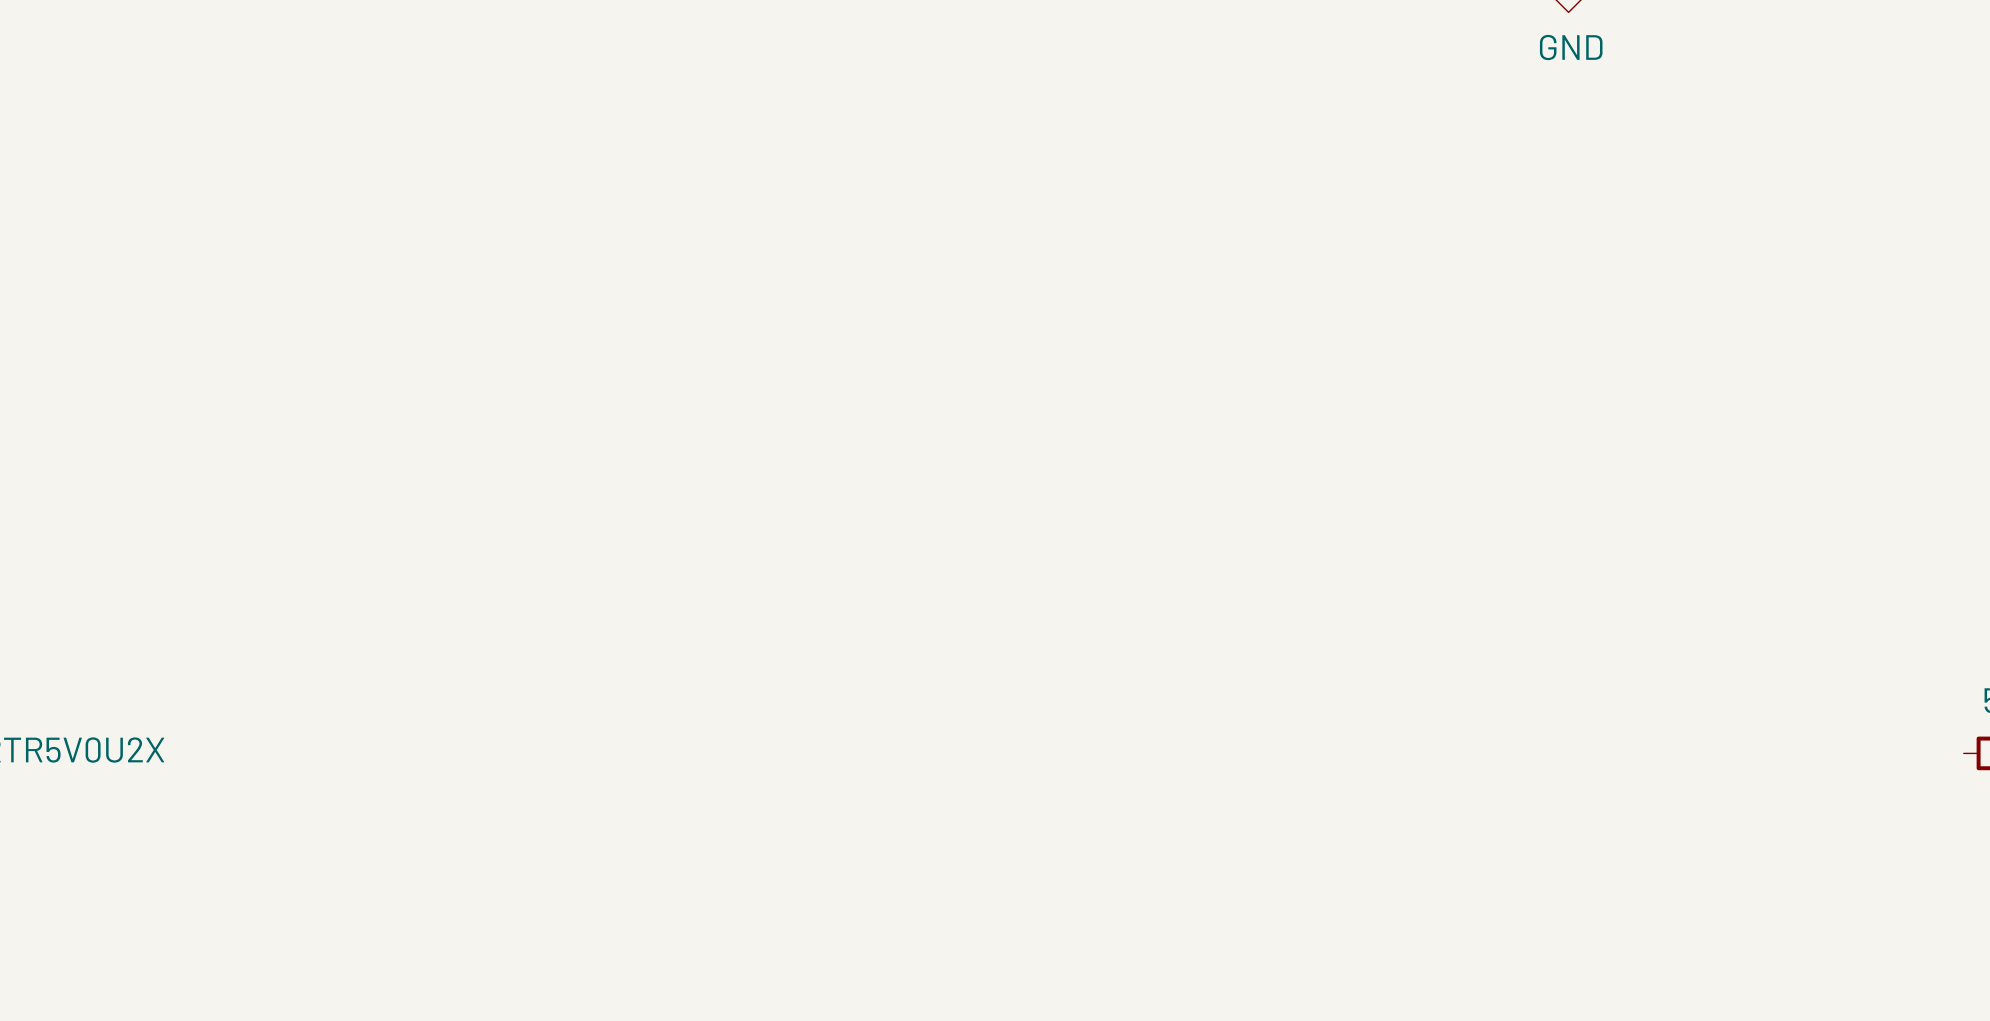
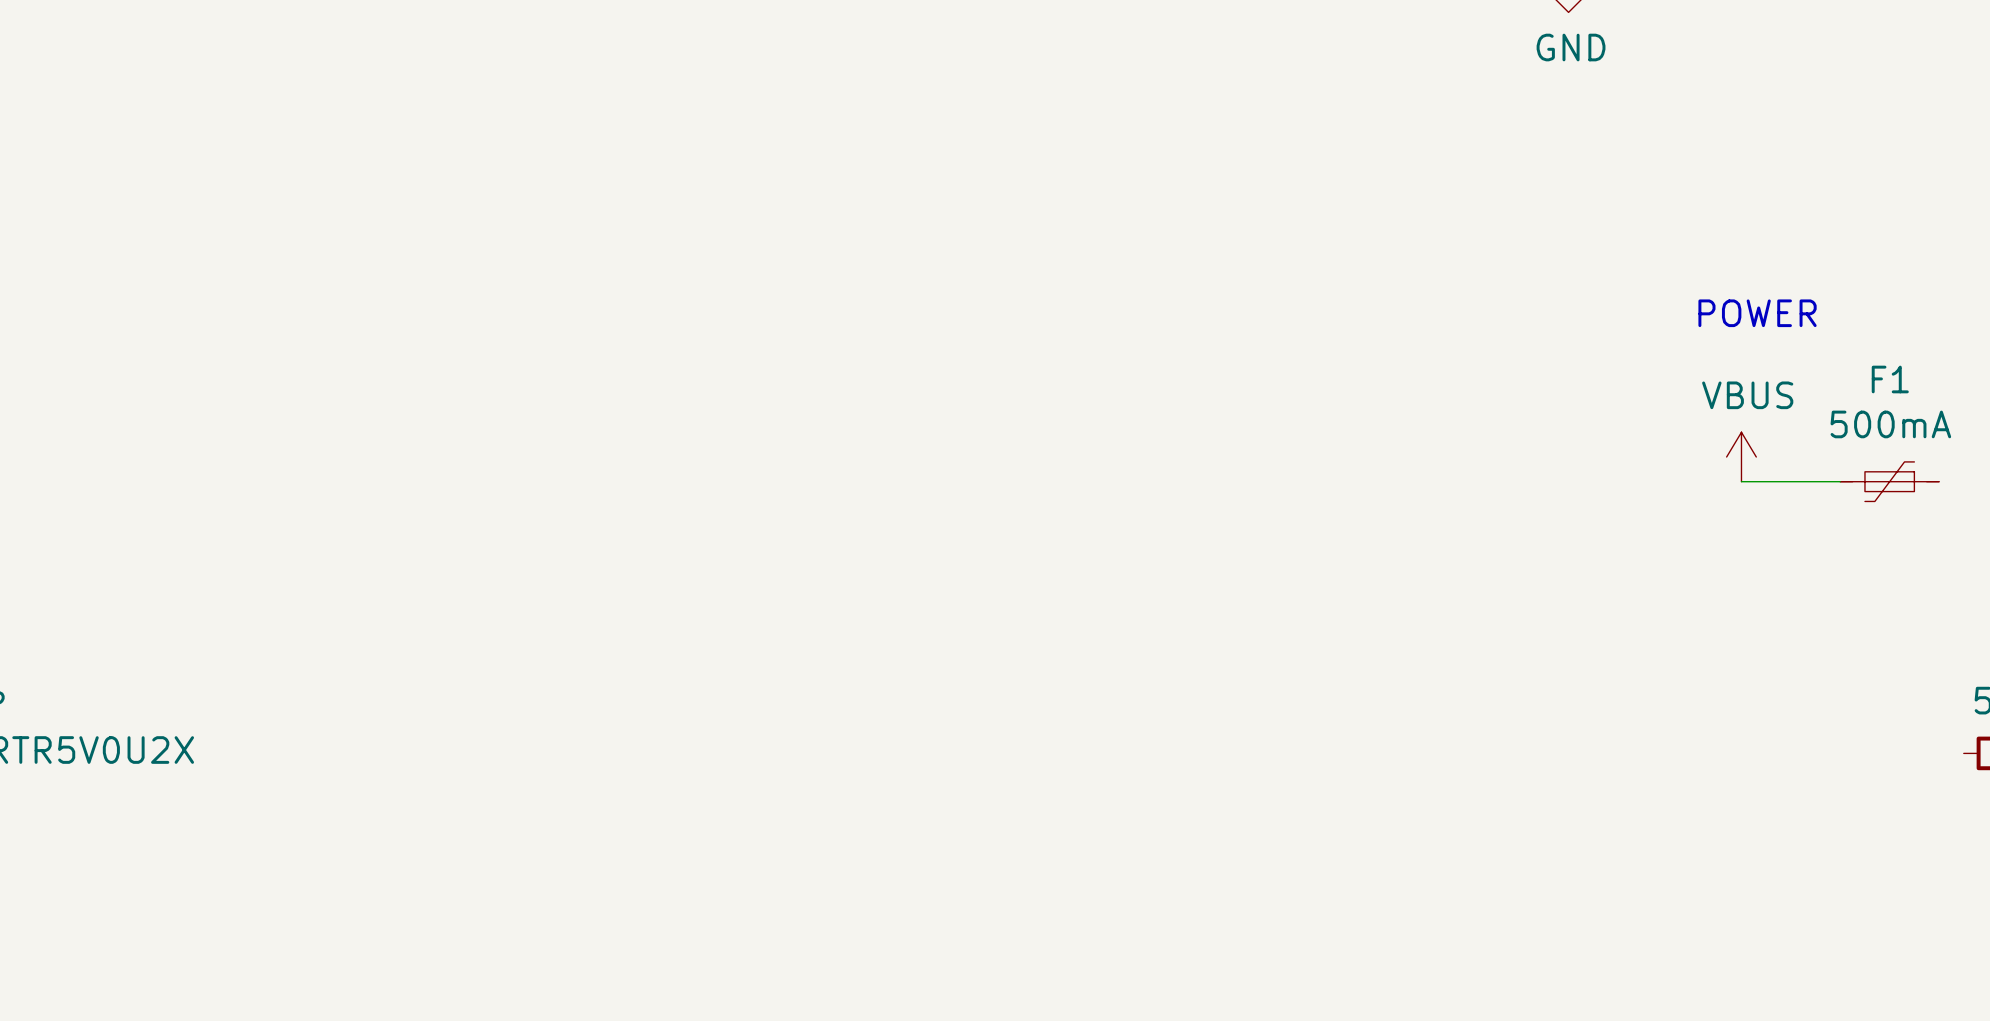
text: none -> POWER (1757, 313)
power symbol: none -> VBUS (1741, 456)
wire: none -> (1741, 481) (1840, 481)
F1: none -> 500mA (1889, 481)

